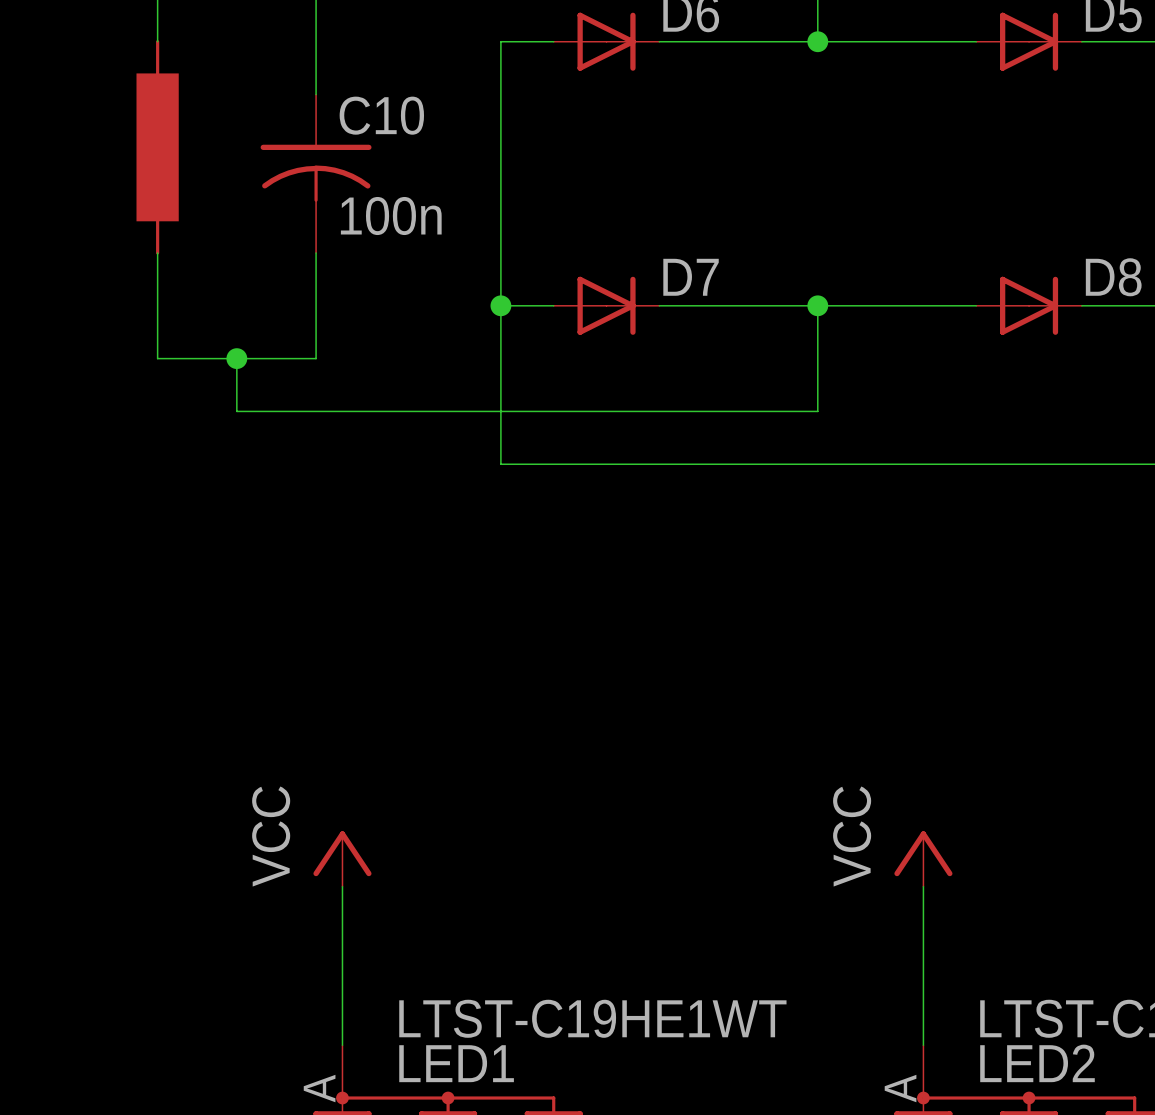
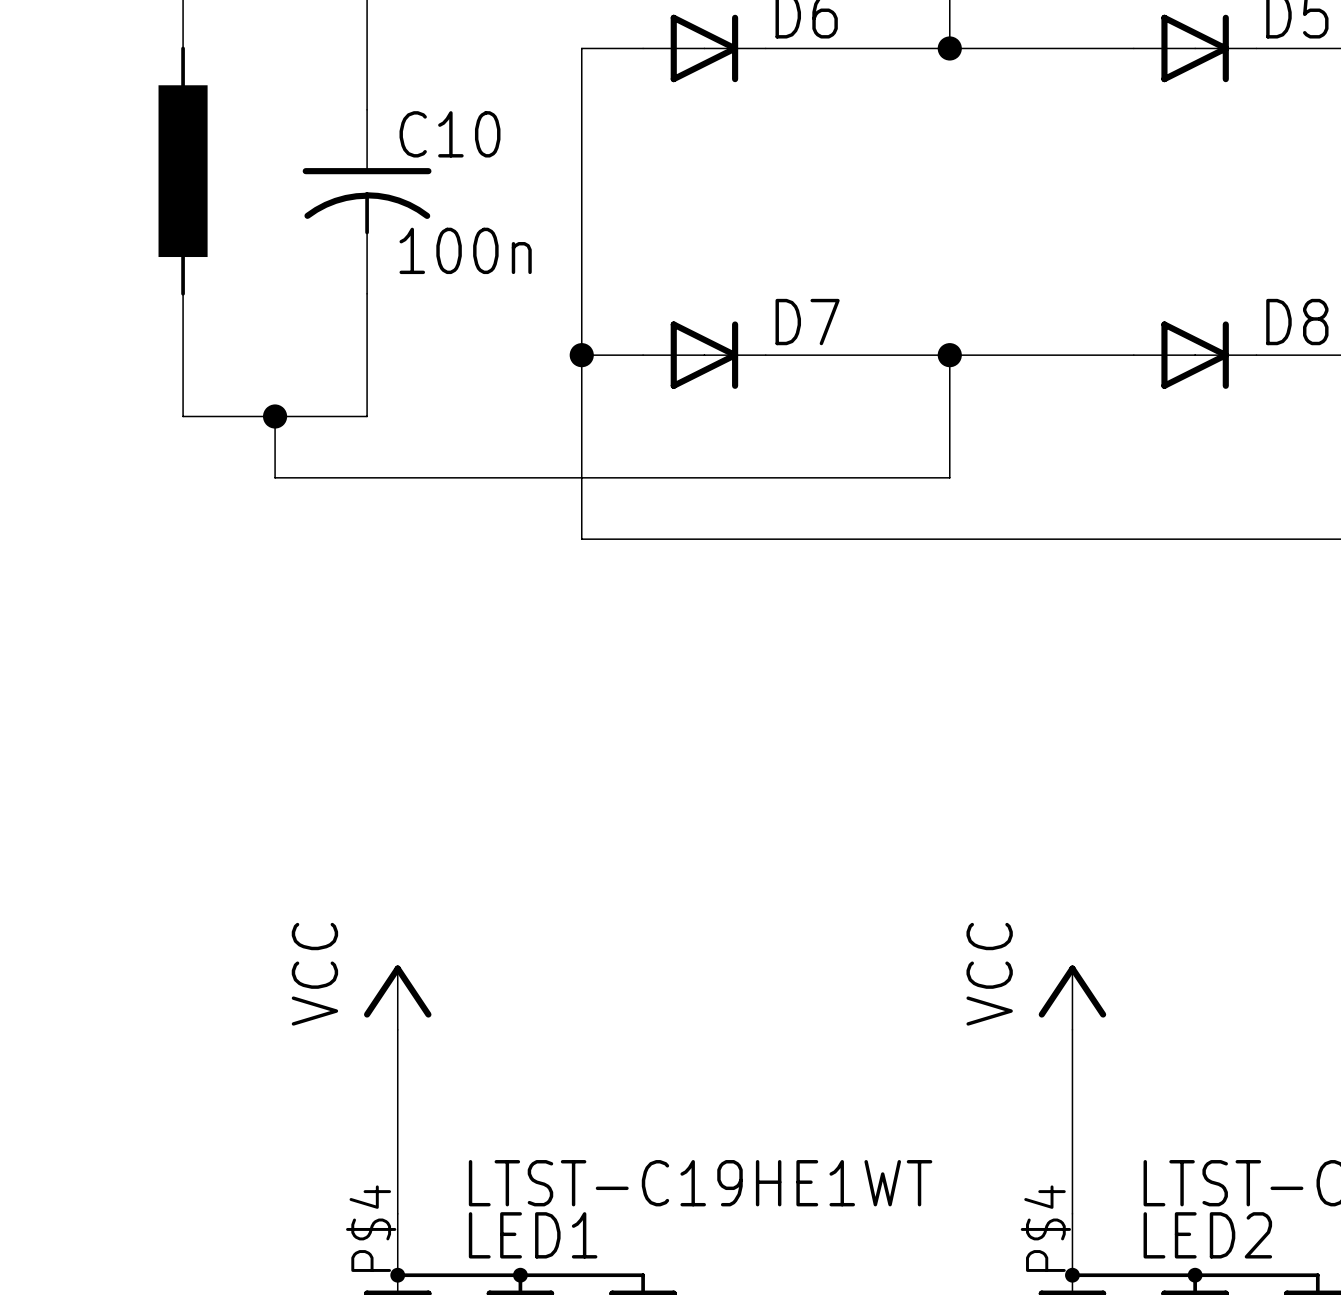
LED1 pin number: A (319, 1088) -> P$4 (371, 1228)
LED2 pin number: A (900, 1088) -> P$4 (1045, 1228)

